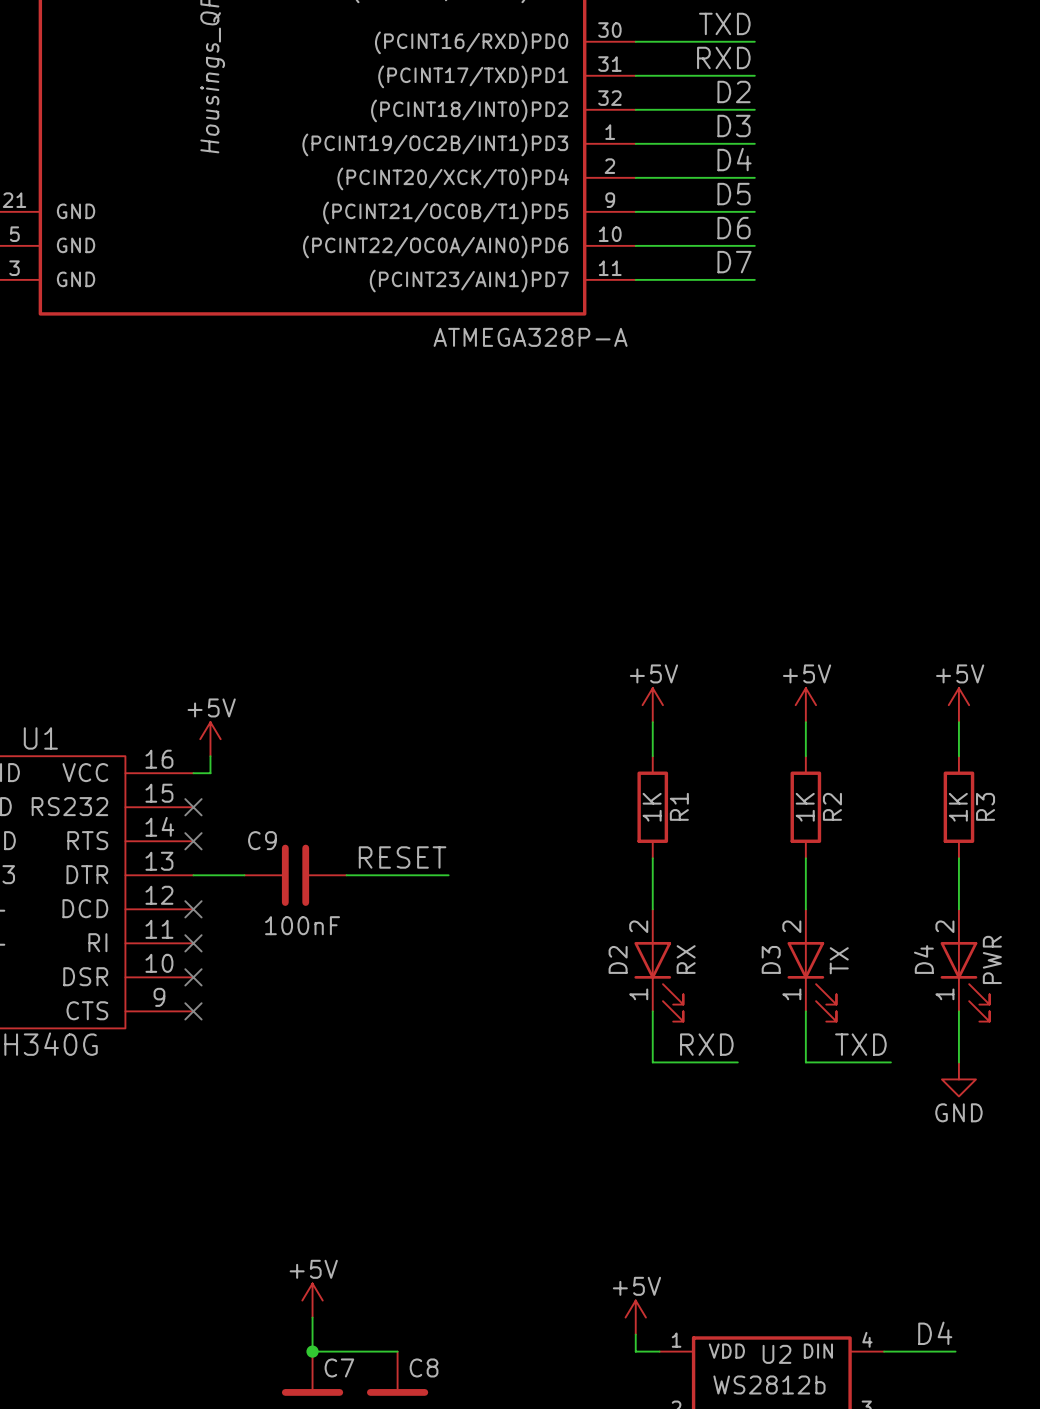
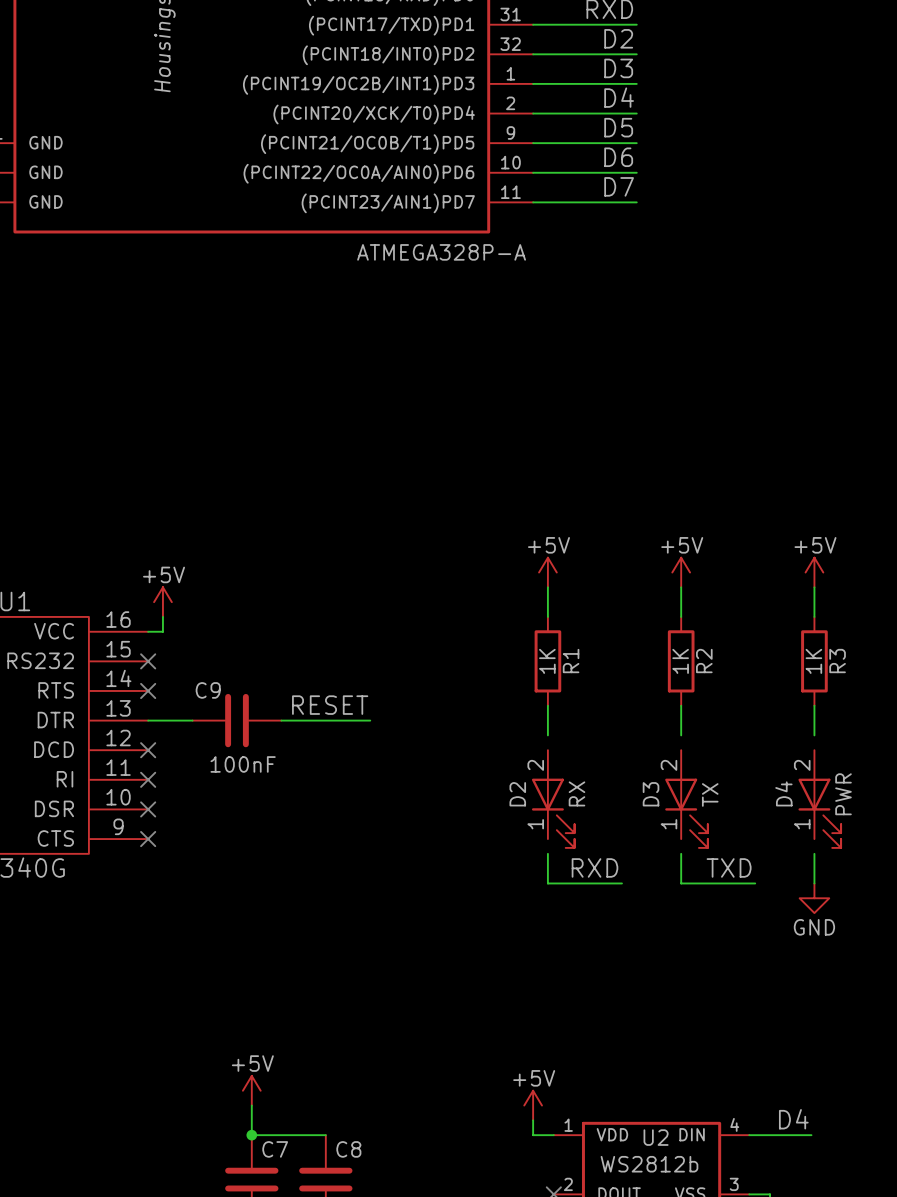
wire: (652, 892) (652, 909) -> none
wire: (805, 892) (805, 909) -> none
wire: (958, 892) (958, 909) -> none
wire: (652, 1011) (652, 1028) -> none
wire: (805, 1011) (805, 1028) -> none
wire: (958, 1011) (958, 1028) -> none

